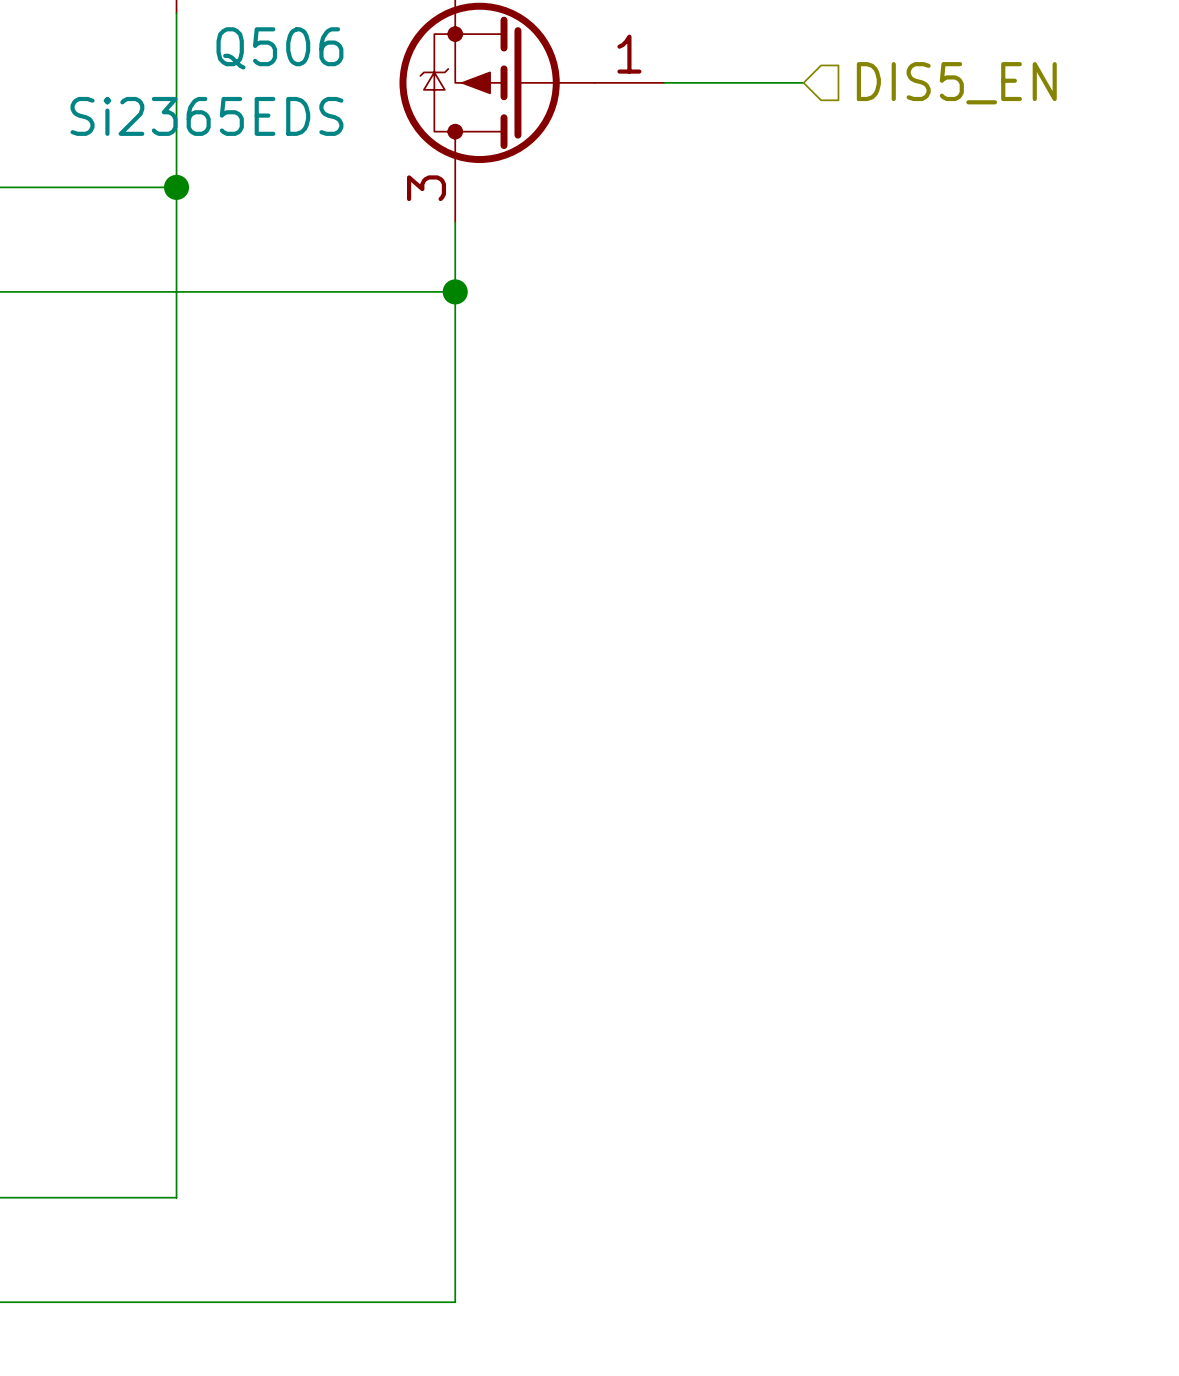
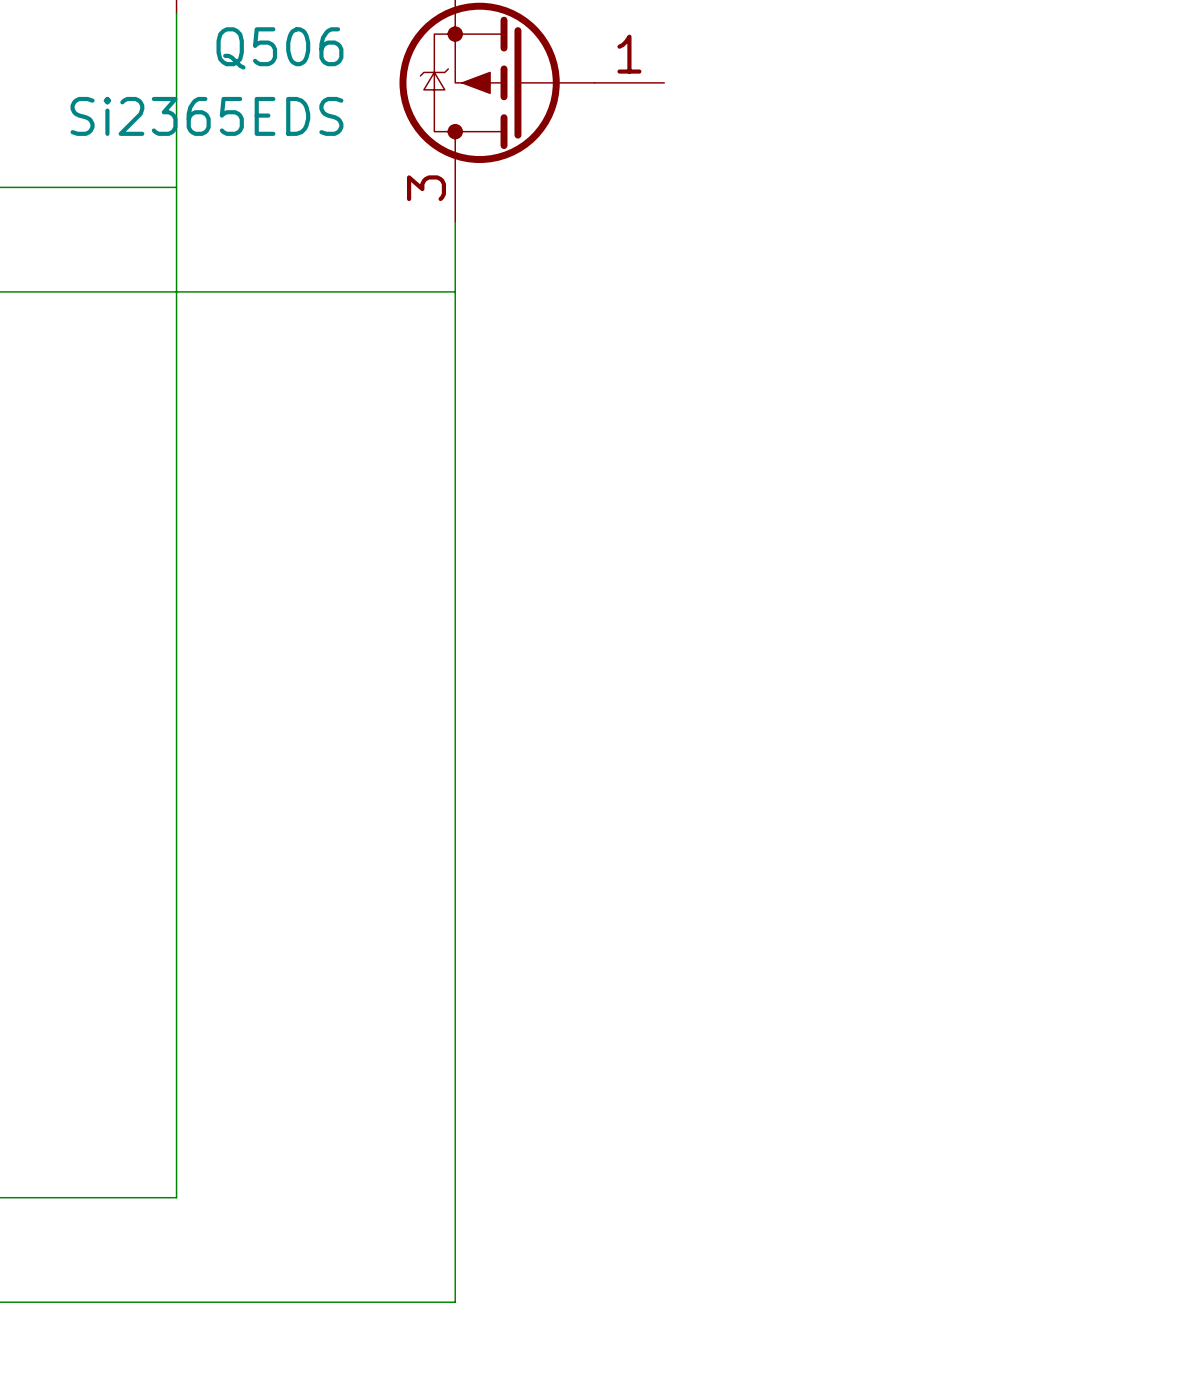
wire: (664, 82) (803, 82) -> none
hierarchical label: DIS5_EN (956, 83) -> none
junction: (176, 187) -> none
junction: (455, 291) -> none

